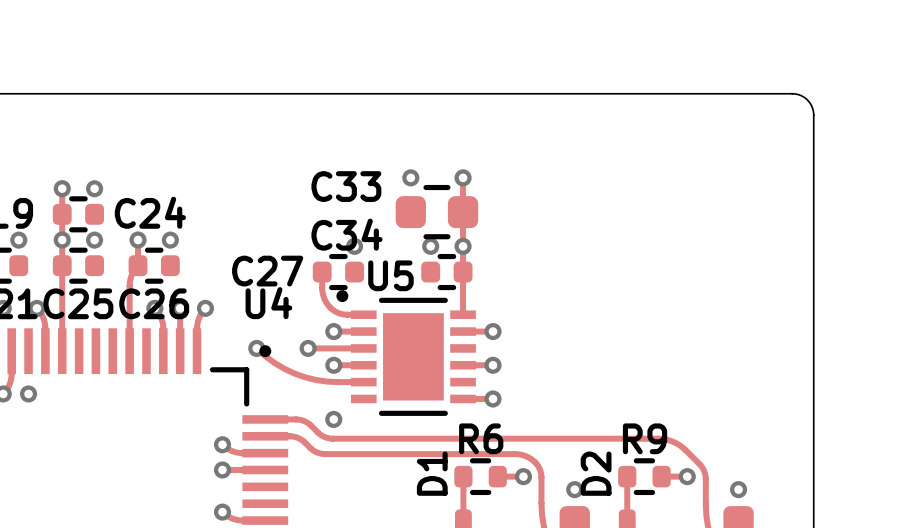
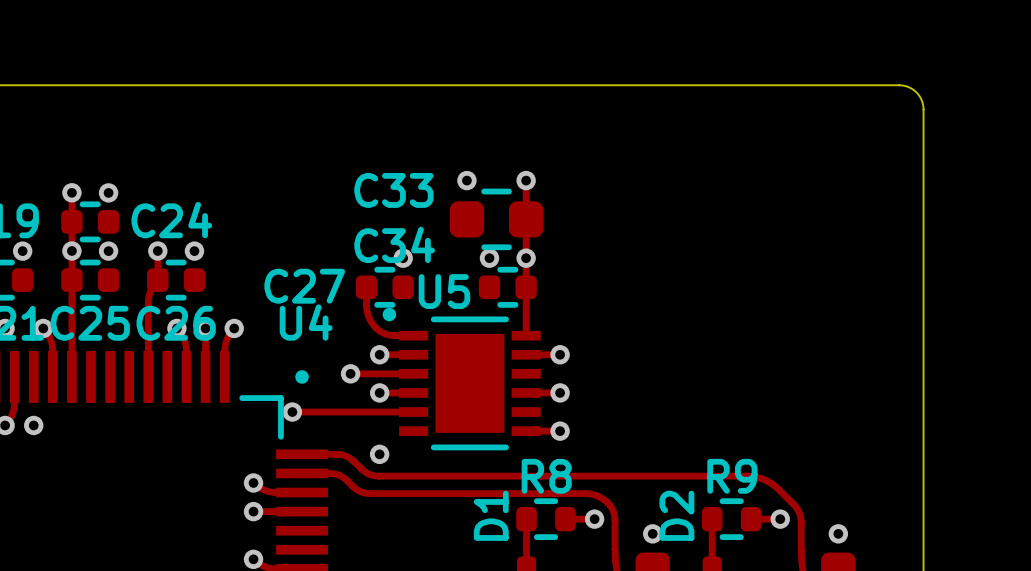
track: (256, 348) (274, 362) (294, 373) (315, 379) (338, 382) -> (292, 412) (384, 412)
via position: (256, 348) -> (292, 412)
R6 name: R6 (481, 438) -> R8 (546, 476)

